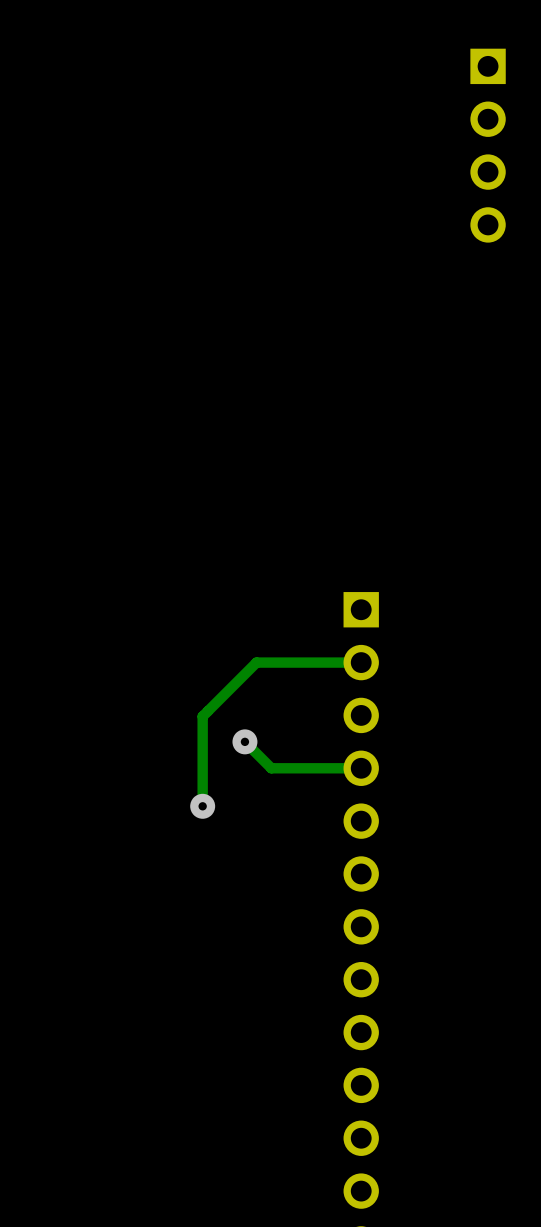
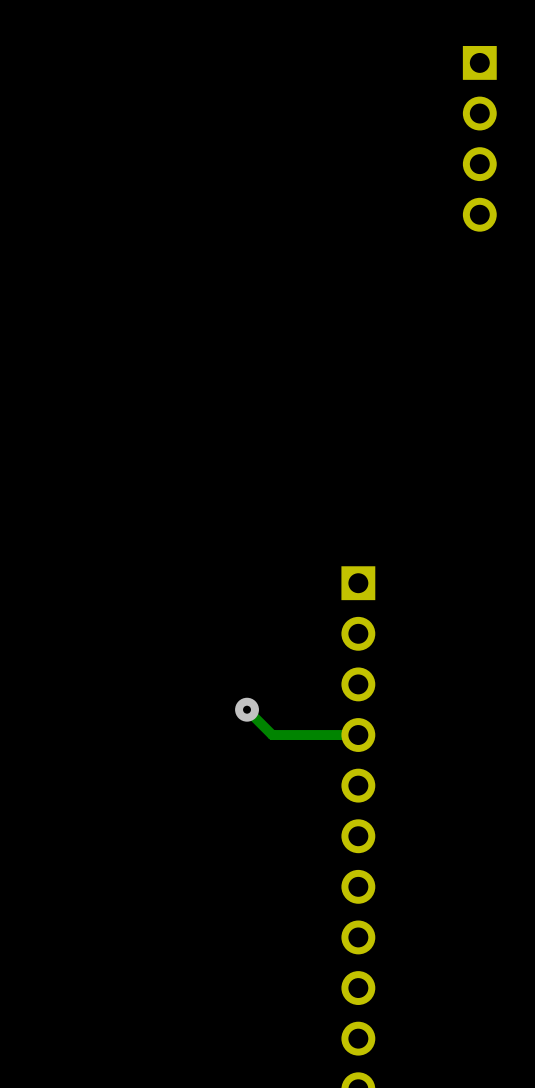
track: (361, 662) (256, 662) (202, 716) (202, 806) -> none
via: (202, 806) -> none

